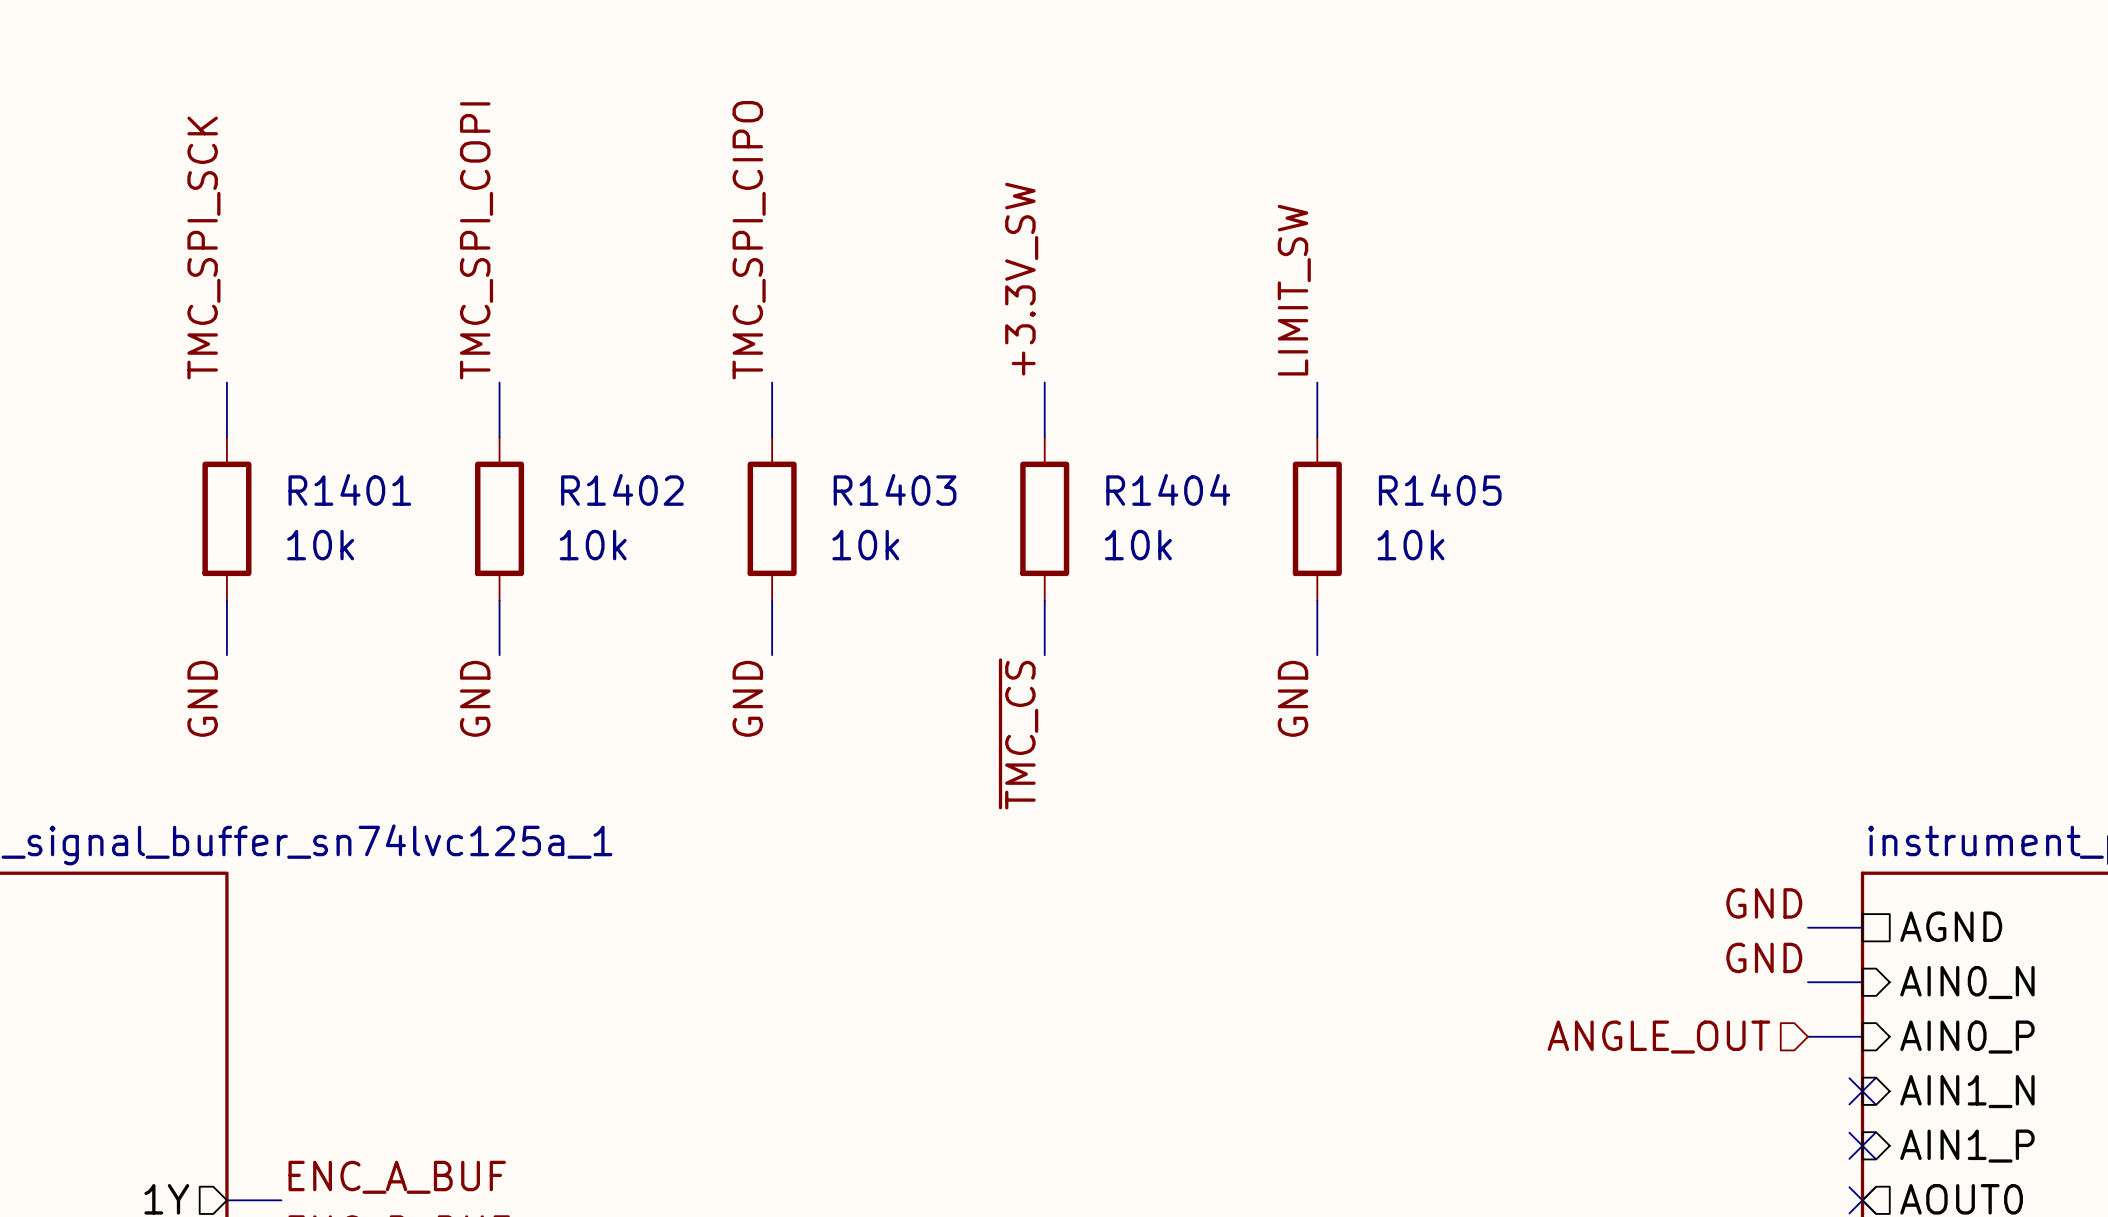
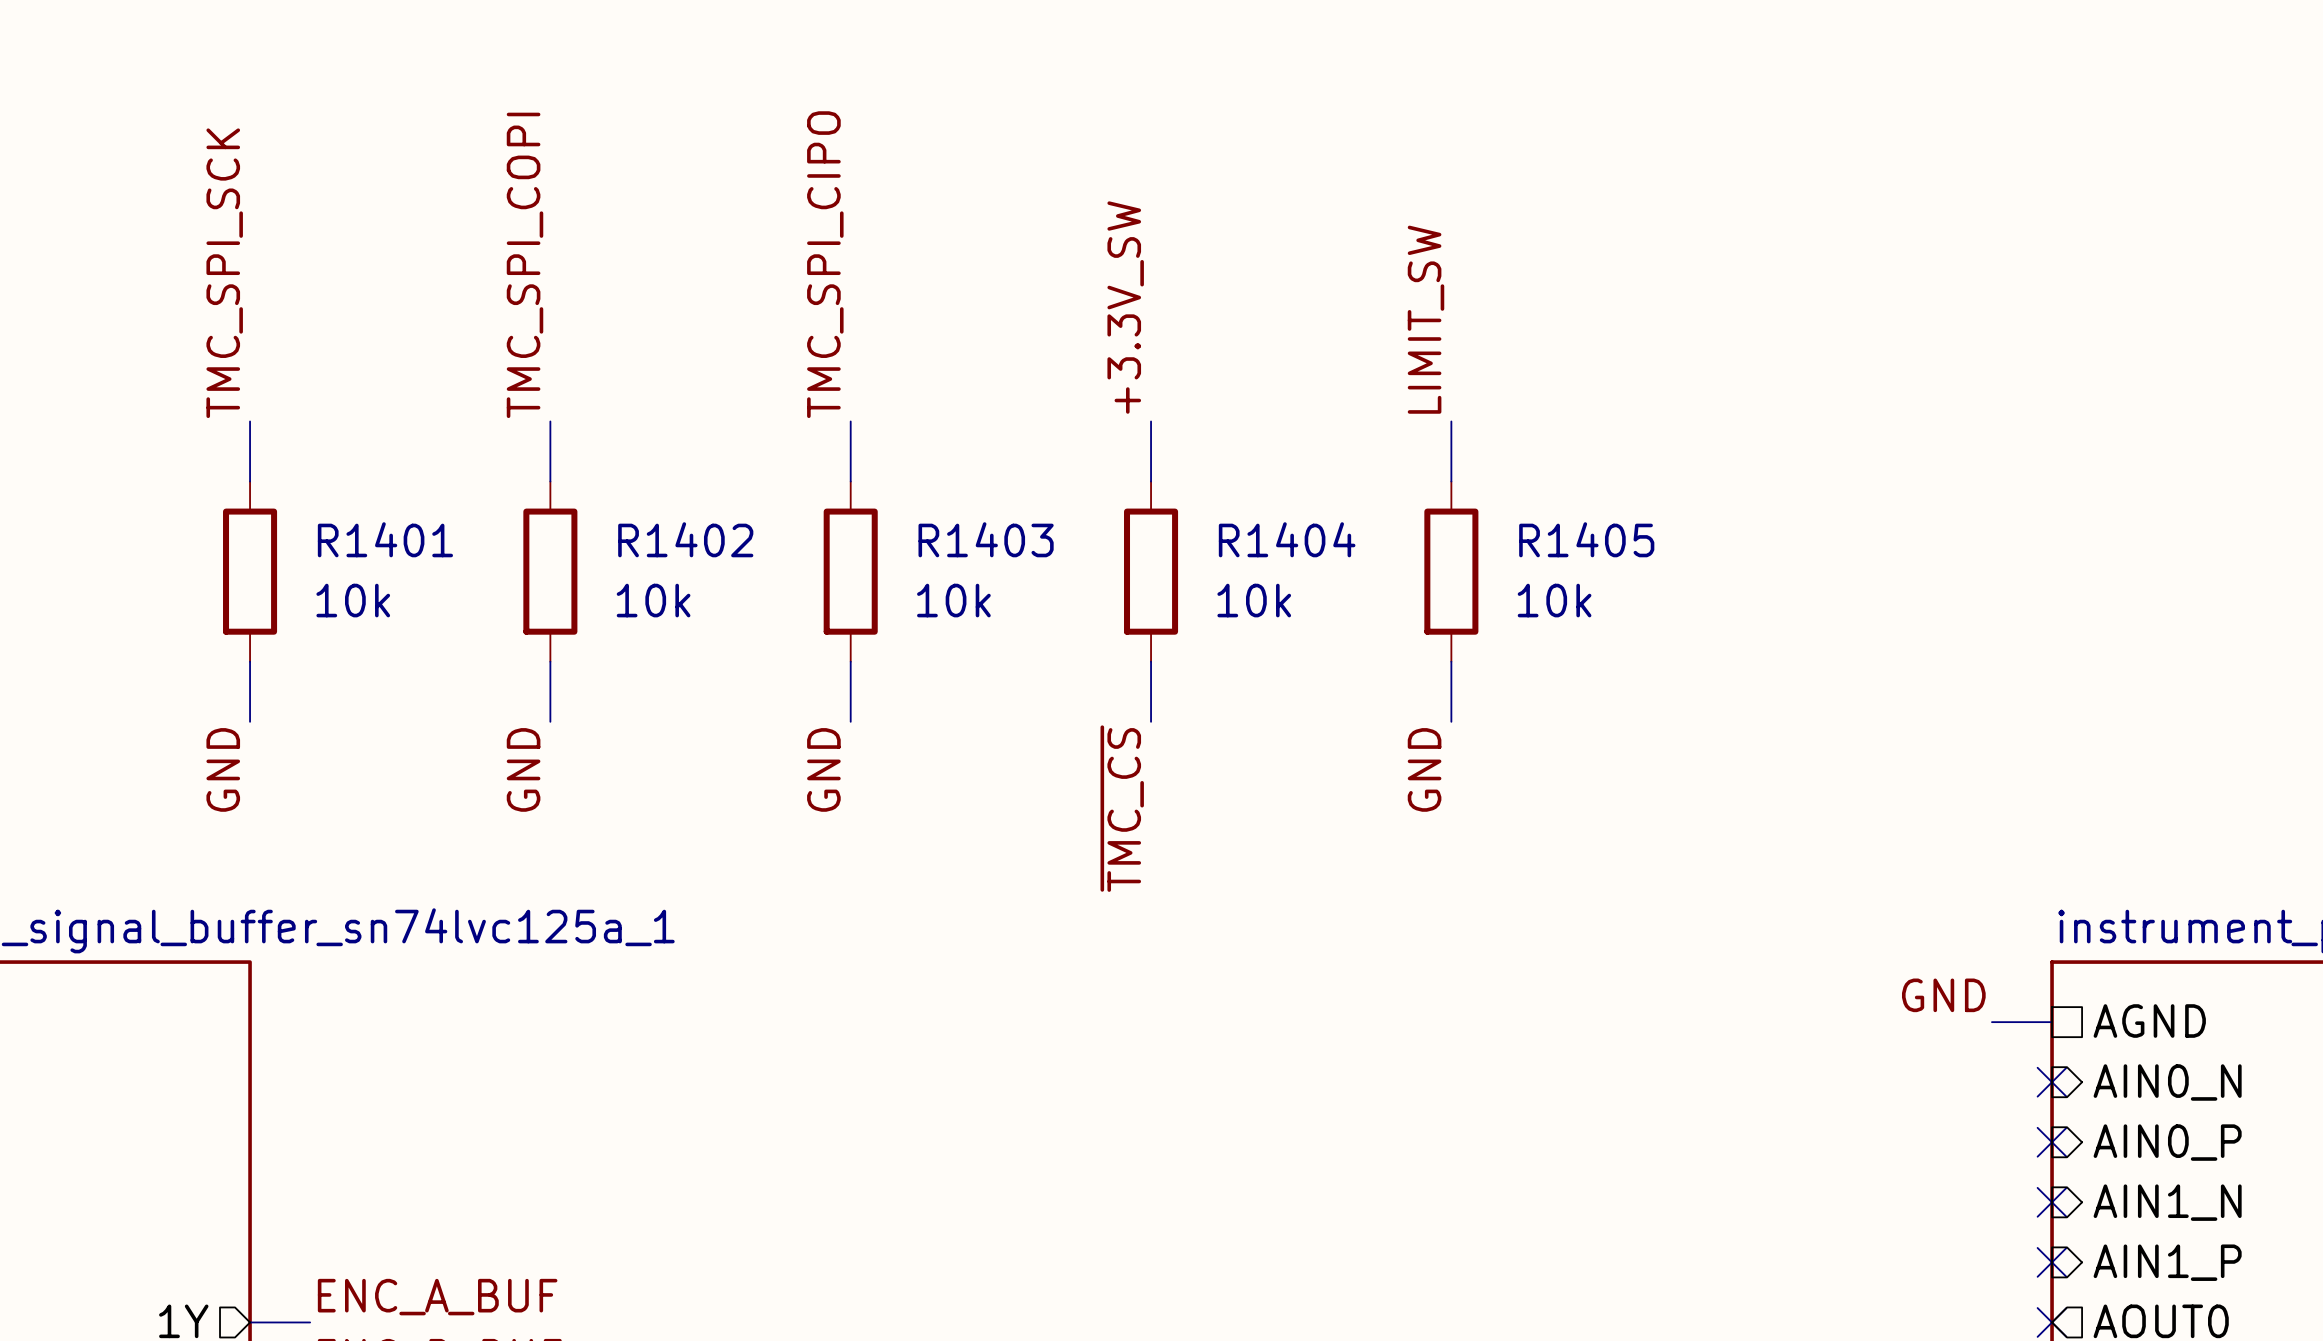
label: GND (1764, 957) -> none
wire: (1807, 982) (1862, 982) -> none
no-connect mark: none -> (2052, 1082)
wire: (1807, 1036) (1862, 1036) -> none
no-connect mark: none -> (2052, 1142)
hierarchical label: ANGLE_OUT (1658, 1037) -> none

